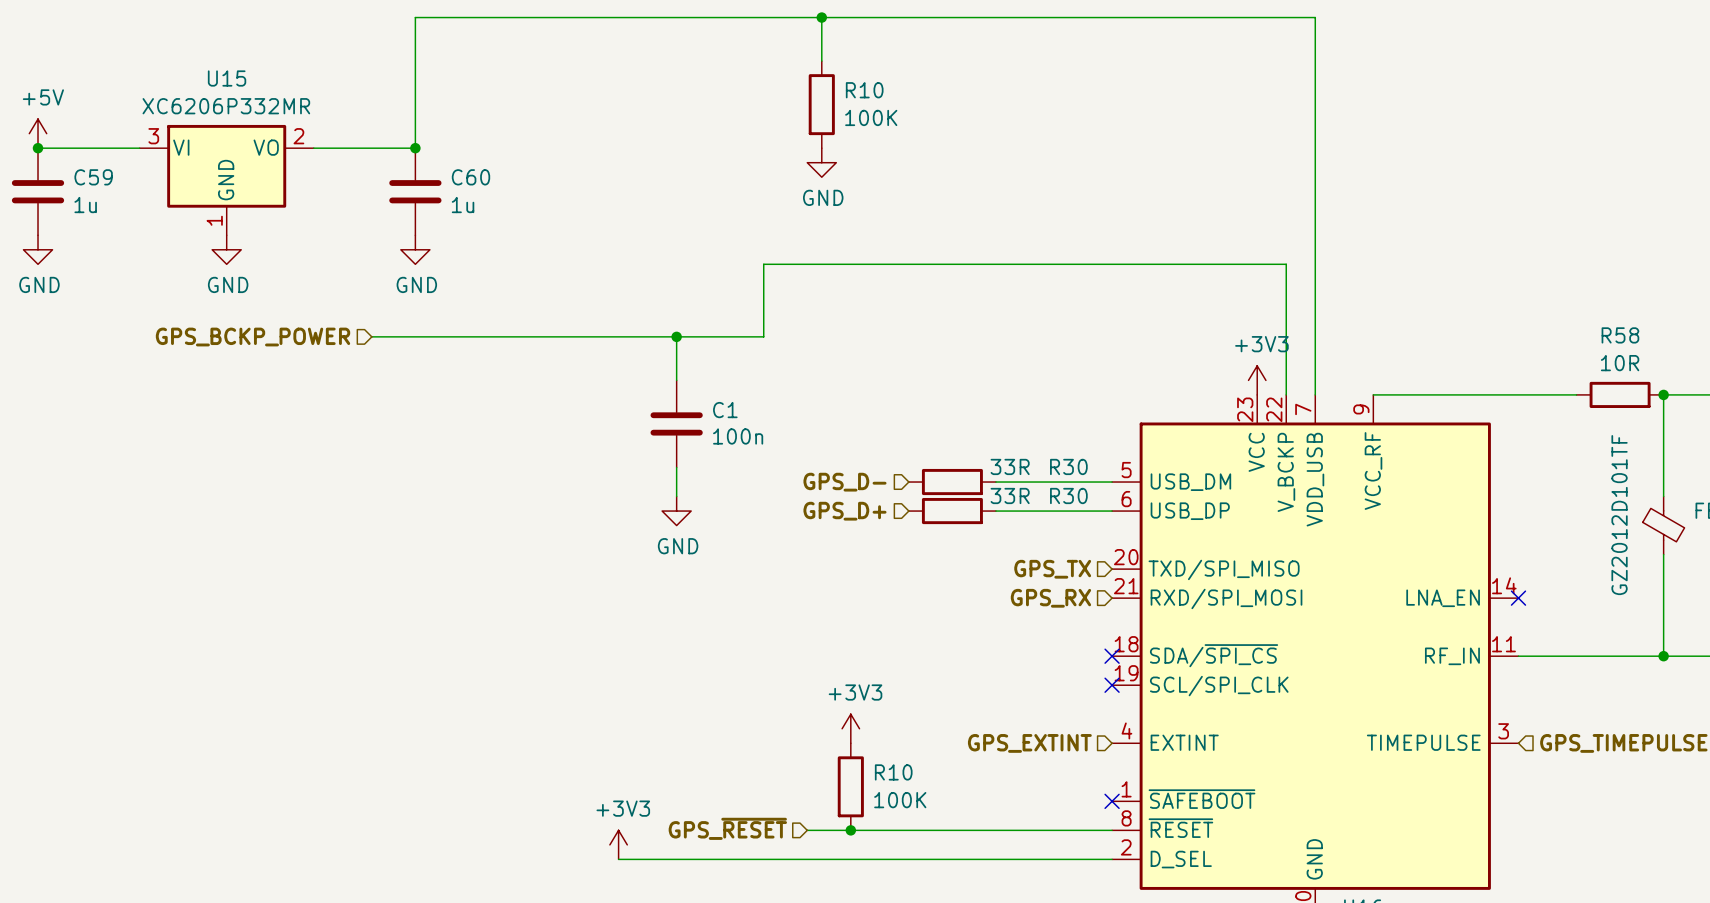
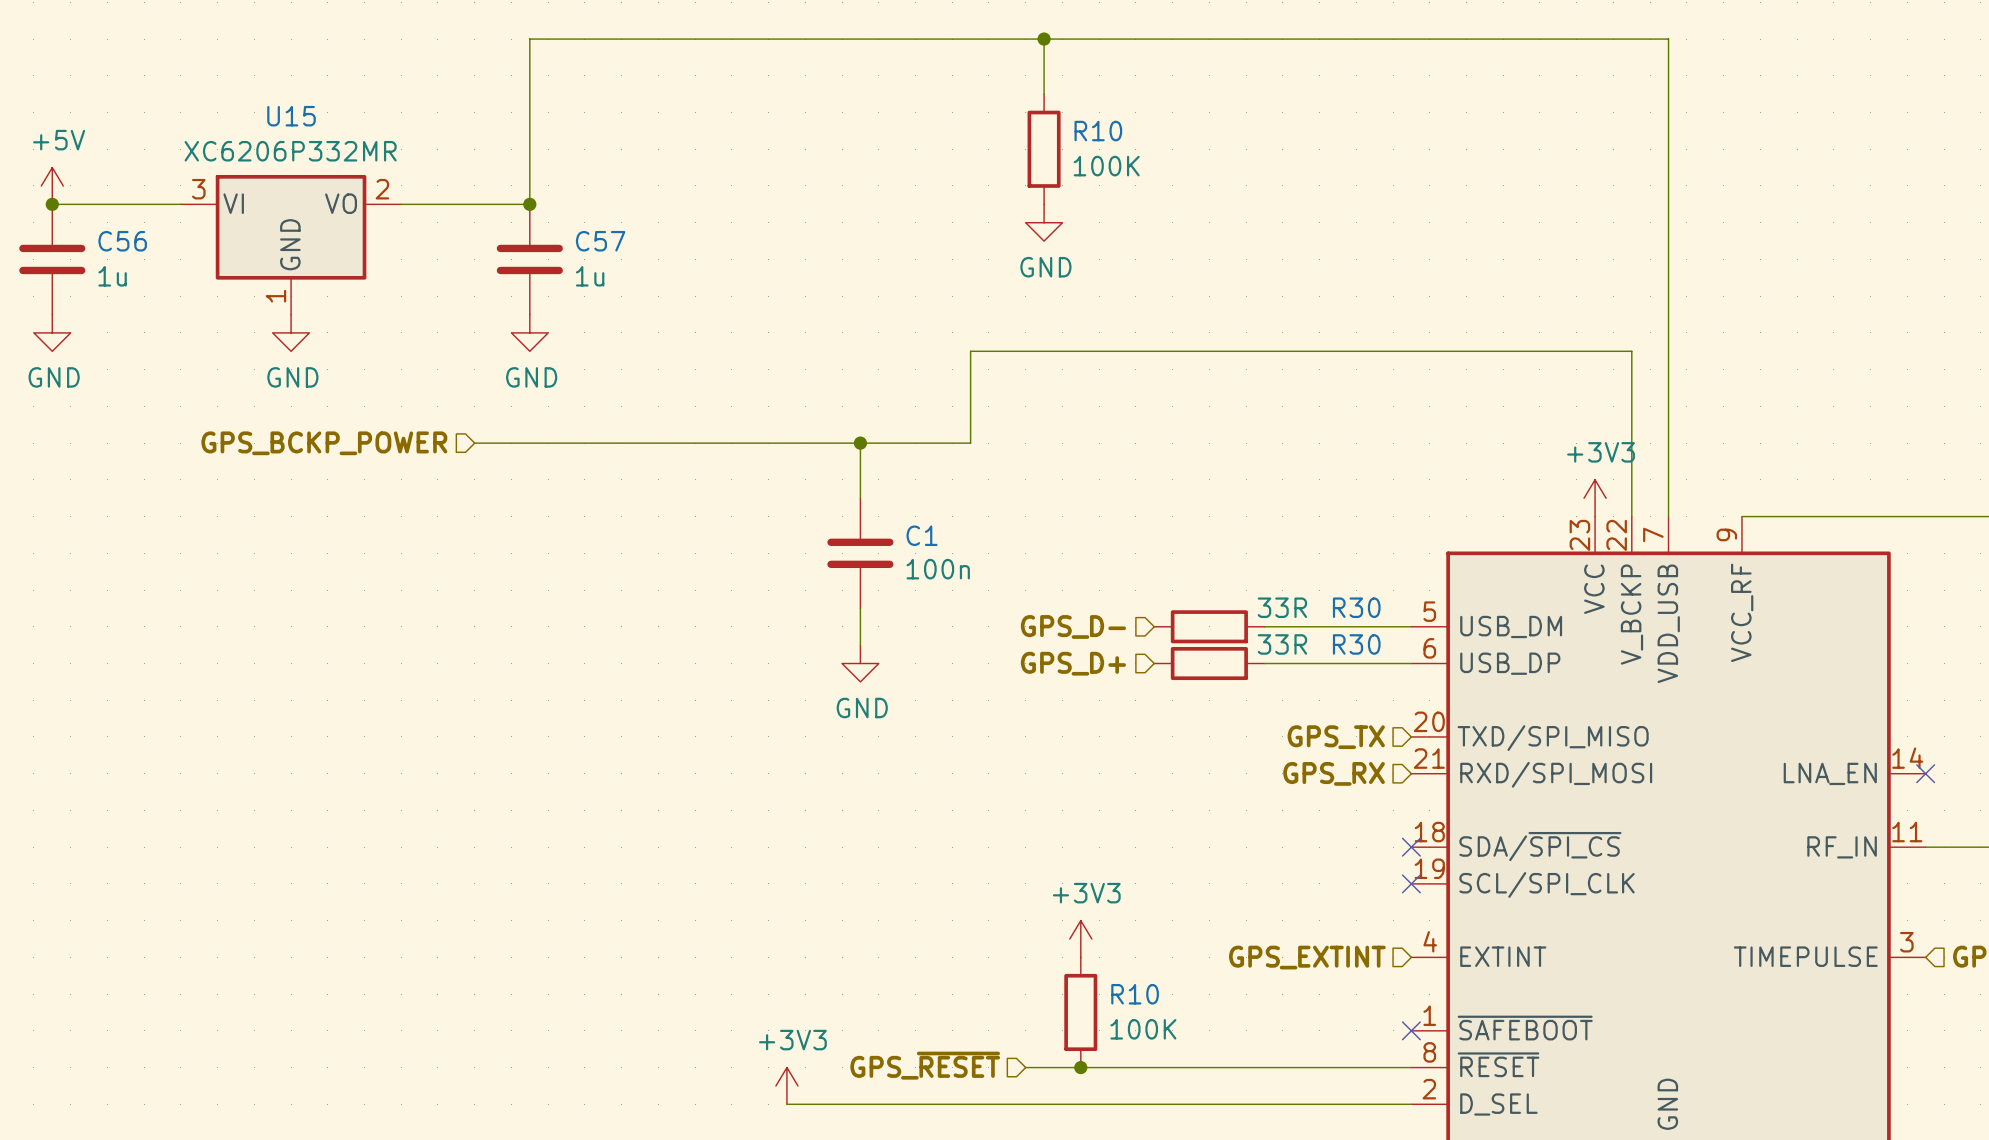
C59 name: C59 (93, 177) -> C56 (122, 241)
C60 name: C60 (470, 177) -> C57 (600, 241)

